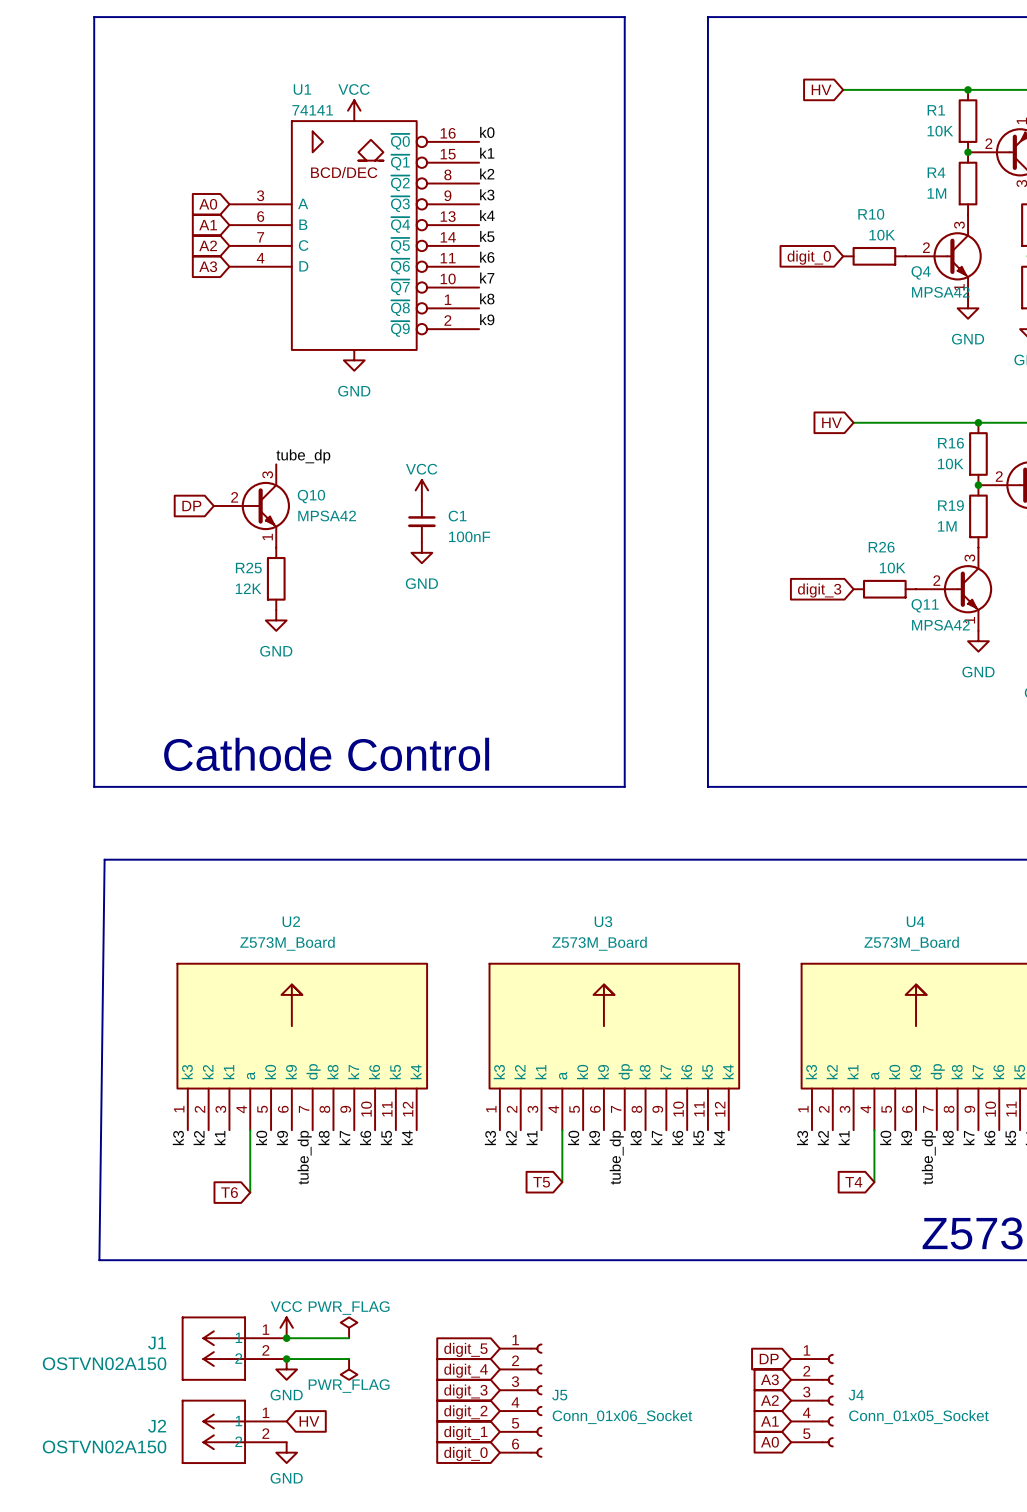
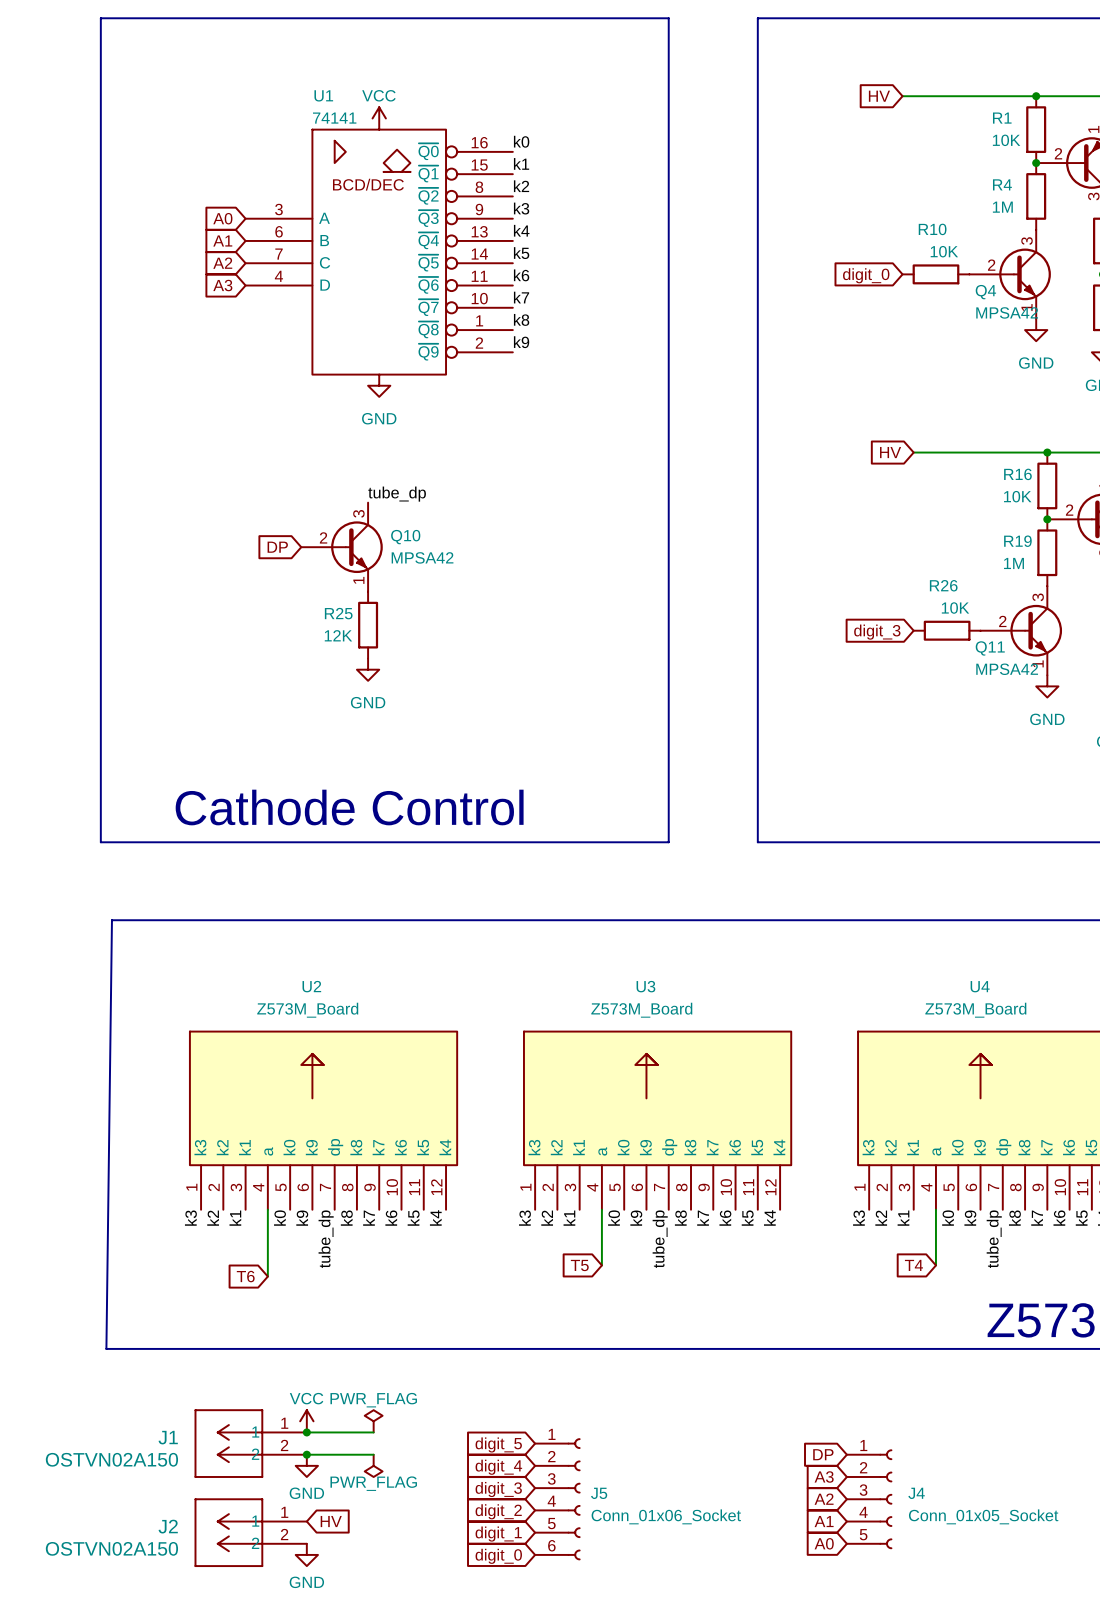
label position: tube_dp (303, 456) -> tube_dp (397, 494)
power symbol: VCC (421, 490) -> none
global label position: DP (191, 506) -> DP (277, 547)
Q10 position: (251, 506) -> (342, 547)
C1: 100nF (421, 521) -> none
power symbol: GND (421, 552) -> none
R25 position: (276, 578) -> (368, 625)
power symbol: GND (276, 620) -> none
power symbol: none -> GND (368, 669)

